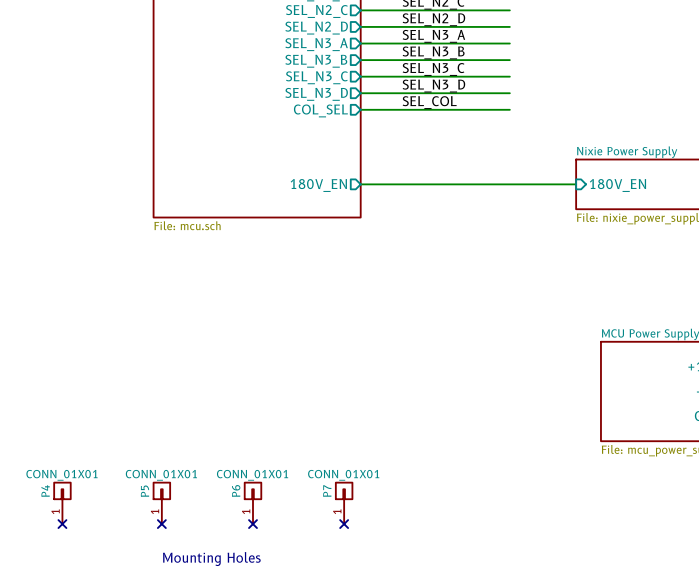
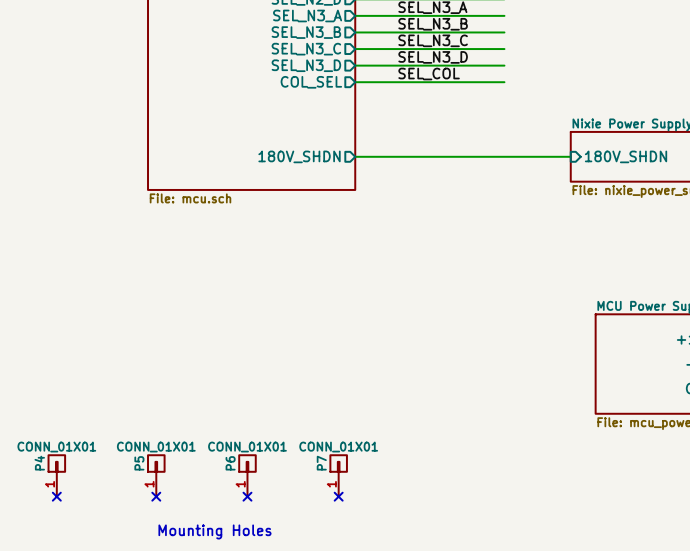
sheet pin: 180V_EN (318, 185) -> 180V_SHDN (299, 156)
sheet pin: 180V_EN (617, 185) -> 180V_SHDN (626, 156)

